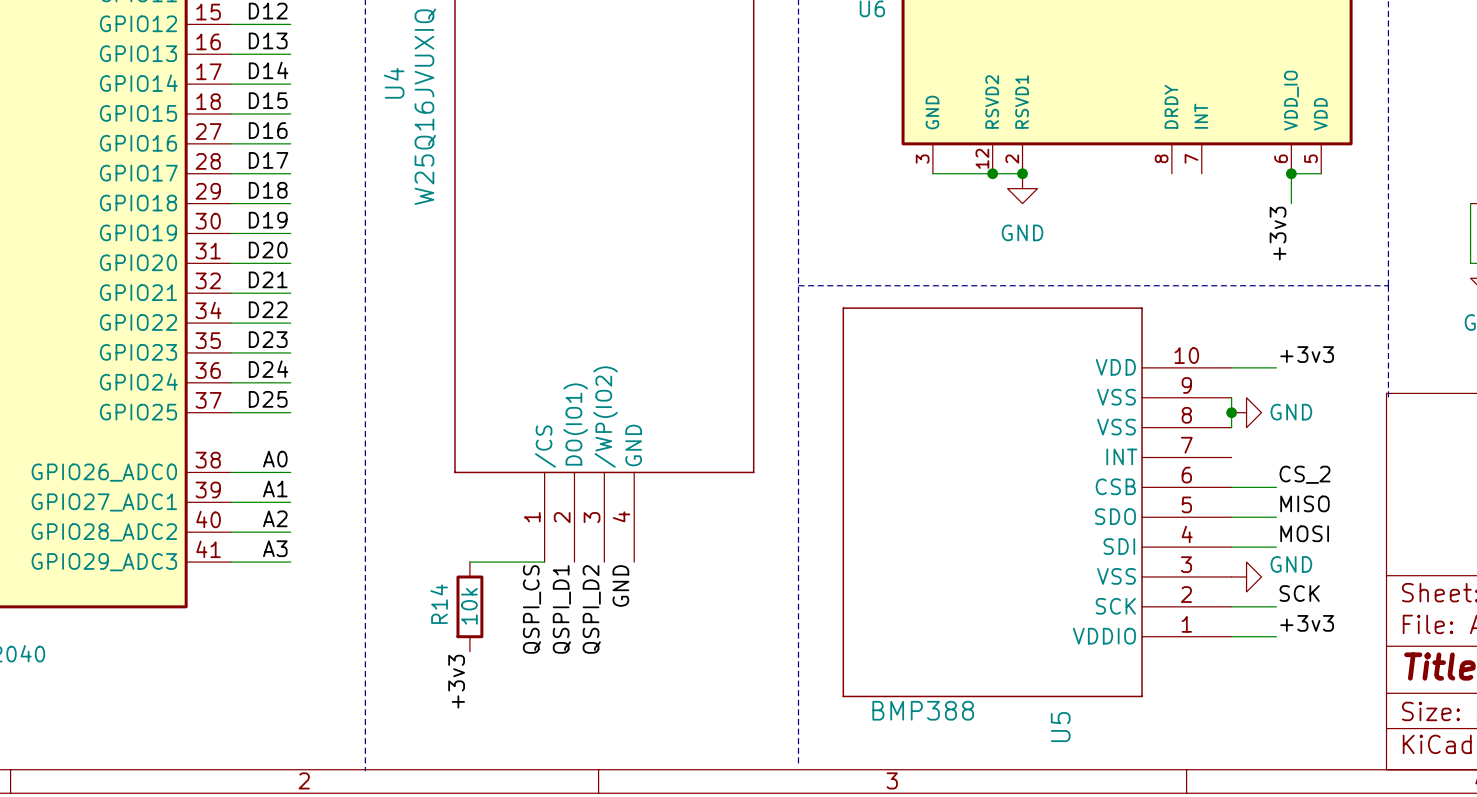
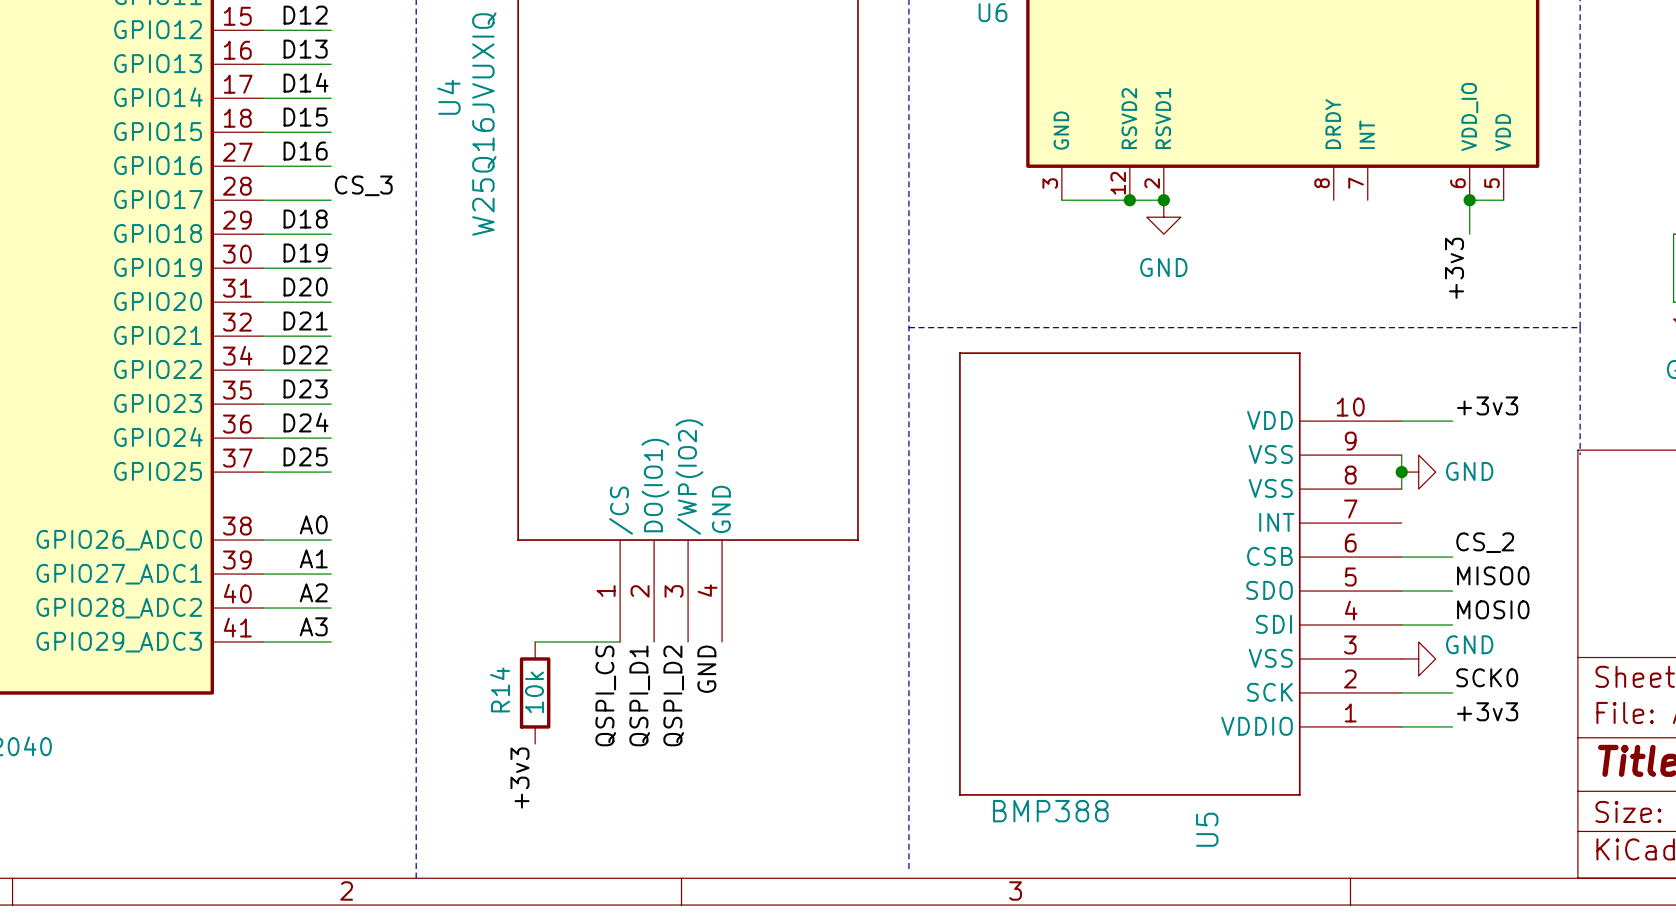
label: D17 (268, 160) -> CS_3 (363, 185)
label: MISO (1304, 503) -> MISO0 (1493, 575)
label: MOSI (1304, 533) -> MOSI0 (1493, 609)
label: SCK (1299, 593) -> SCK0 (1487, 677)

